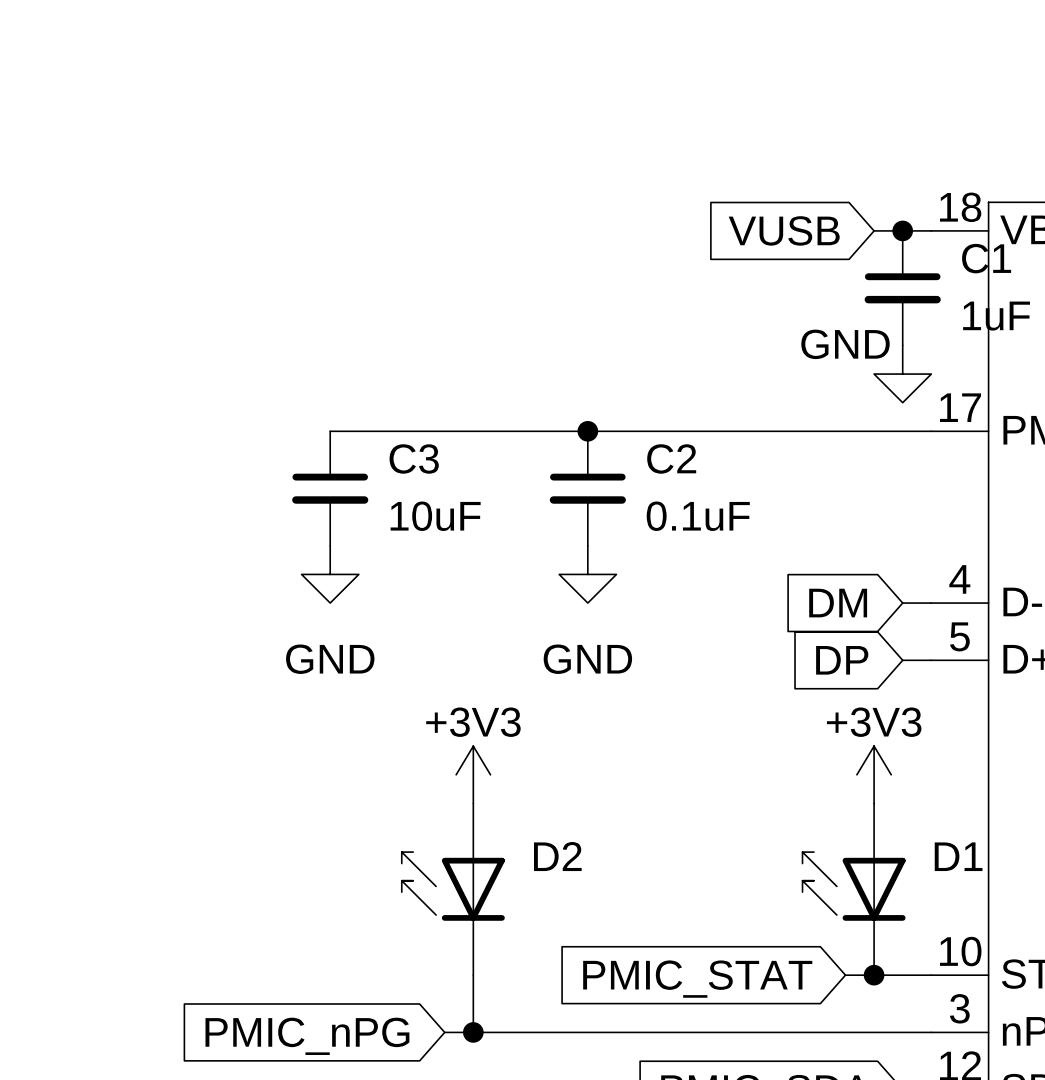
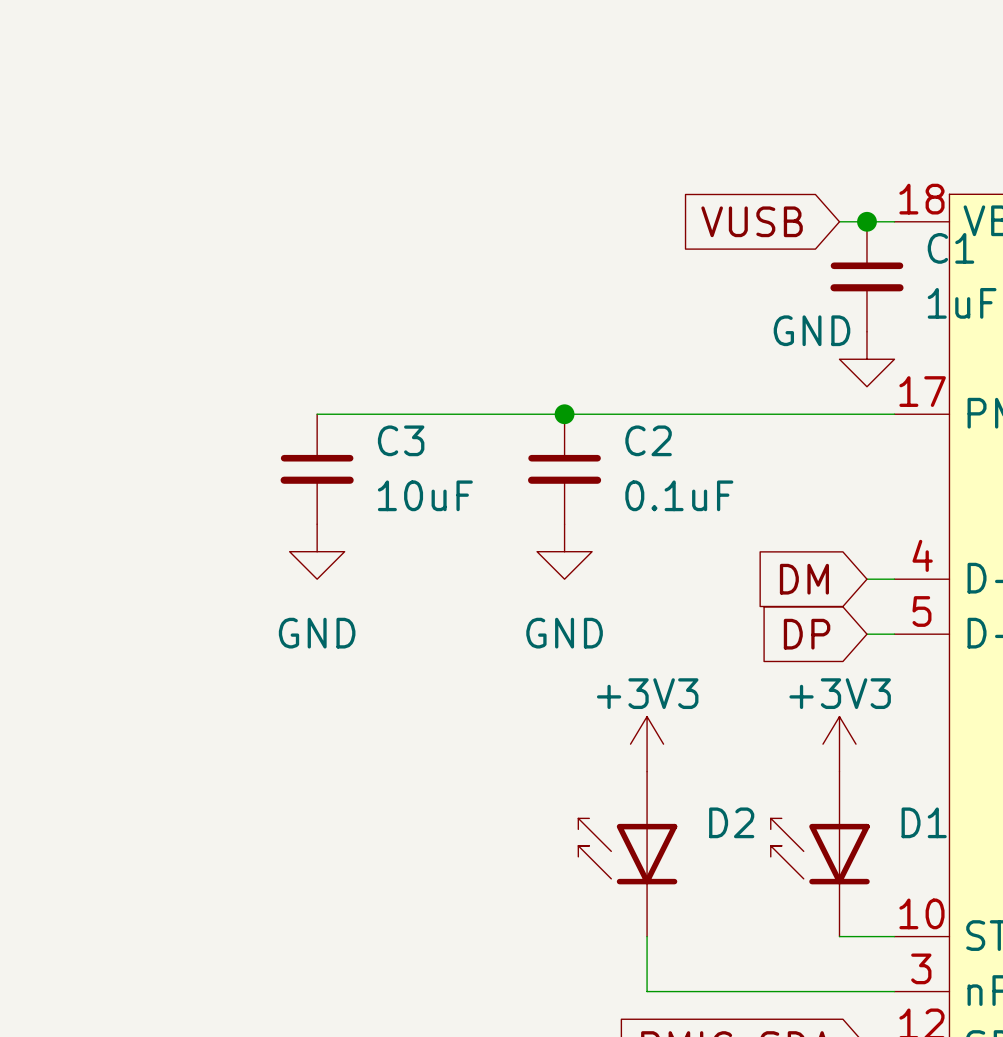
power symbol position: +3V3 (473, 774) -> +3V3 (647, 744)
D2 position: (453, 889) -> (627, 854)
wire: (473, 975) (473, 1032) -> none
wire: (845, 975) (874, 975) -> none
junction: (874, 975) -> none
global label: PMIC_STAT (697, 979) -> none
wire: (444, 1032) (673, 1032) -> (647, 936) (647, 991)
junction: (473, 1032) -> none
global label: PMIC_nPG (307, 1036) -> none

